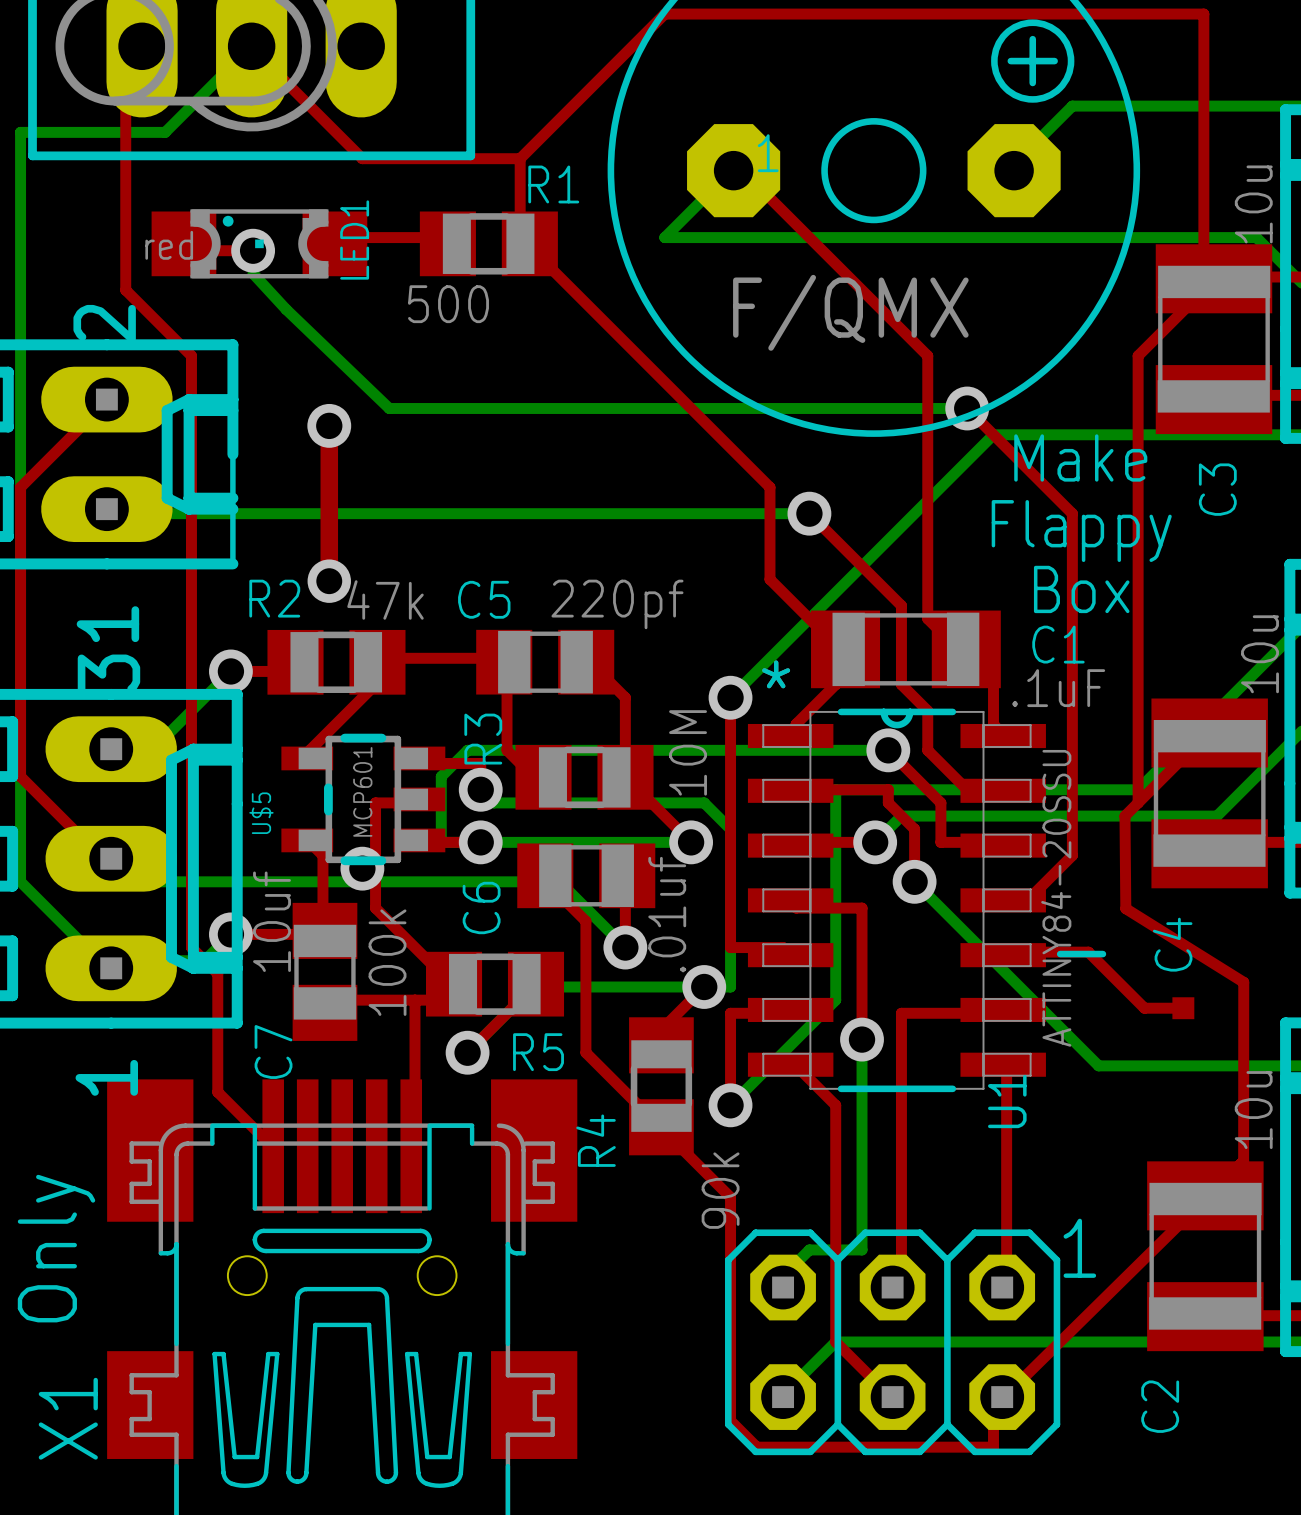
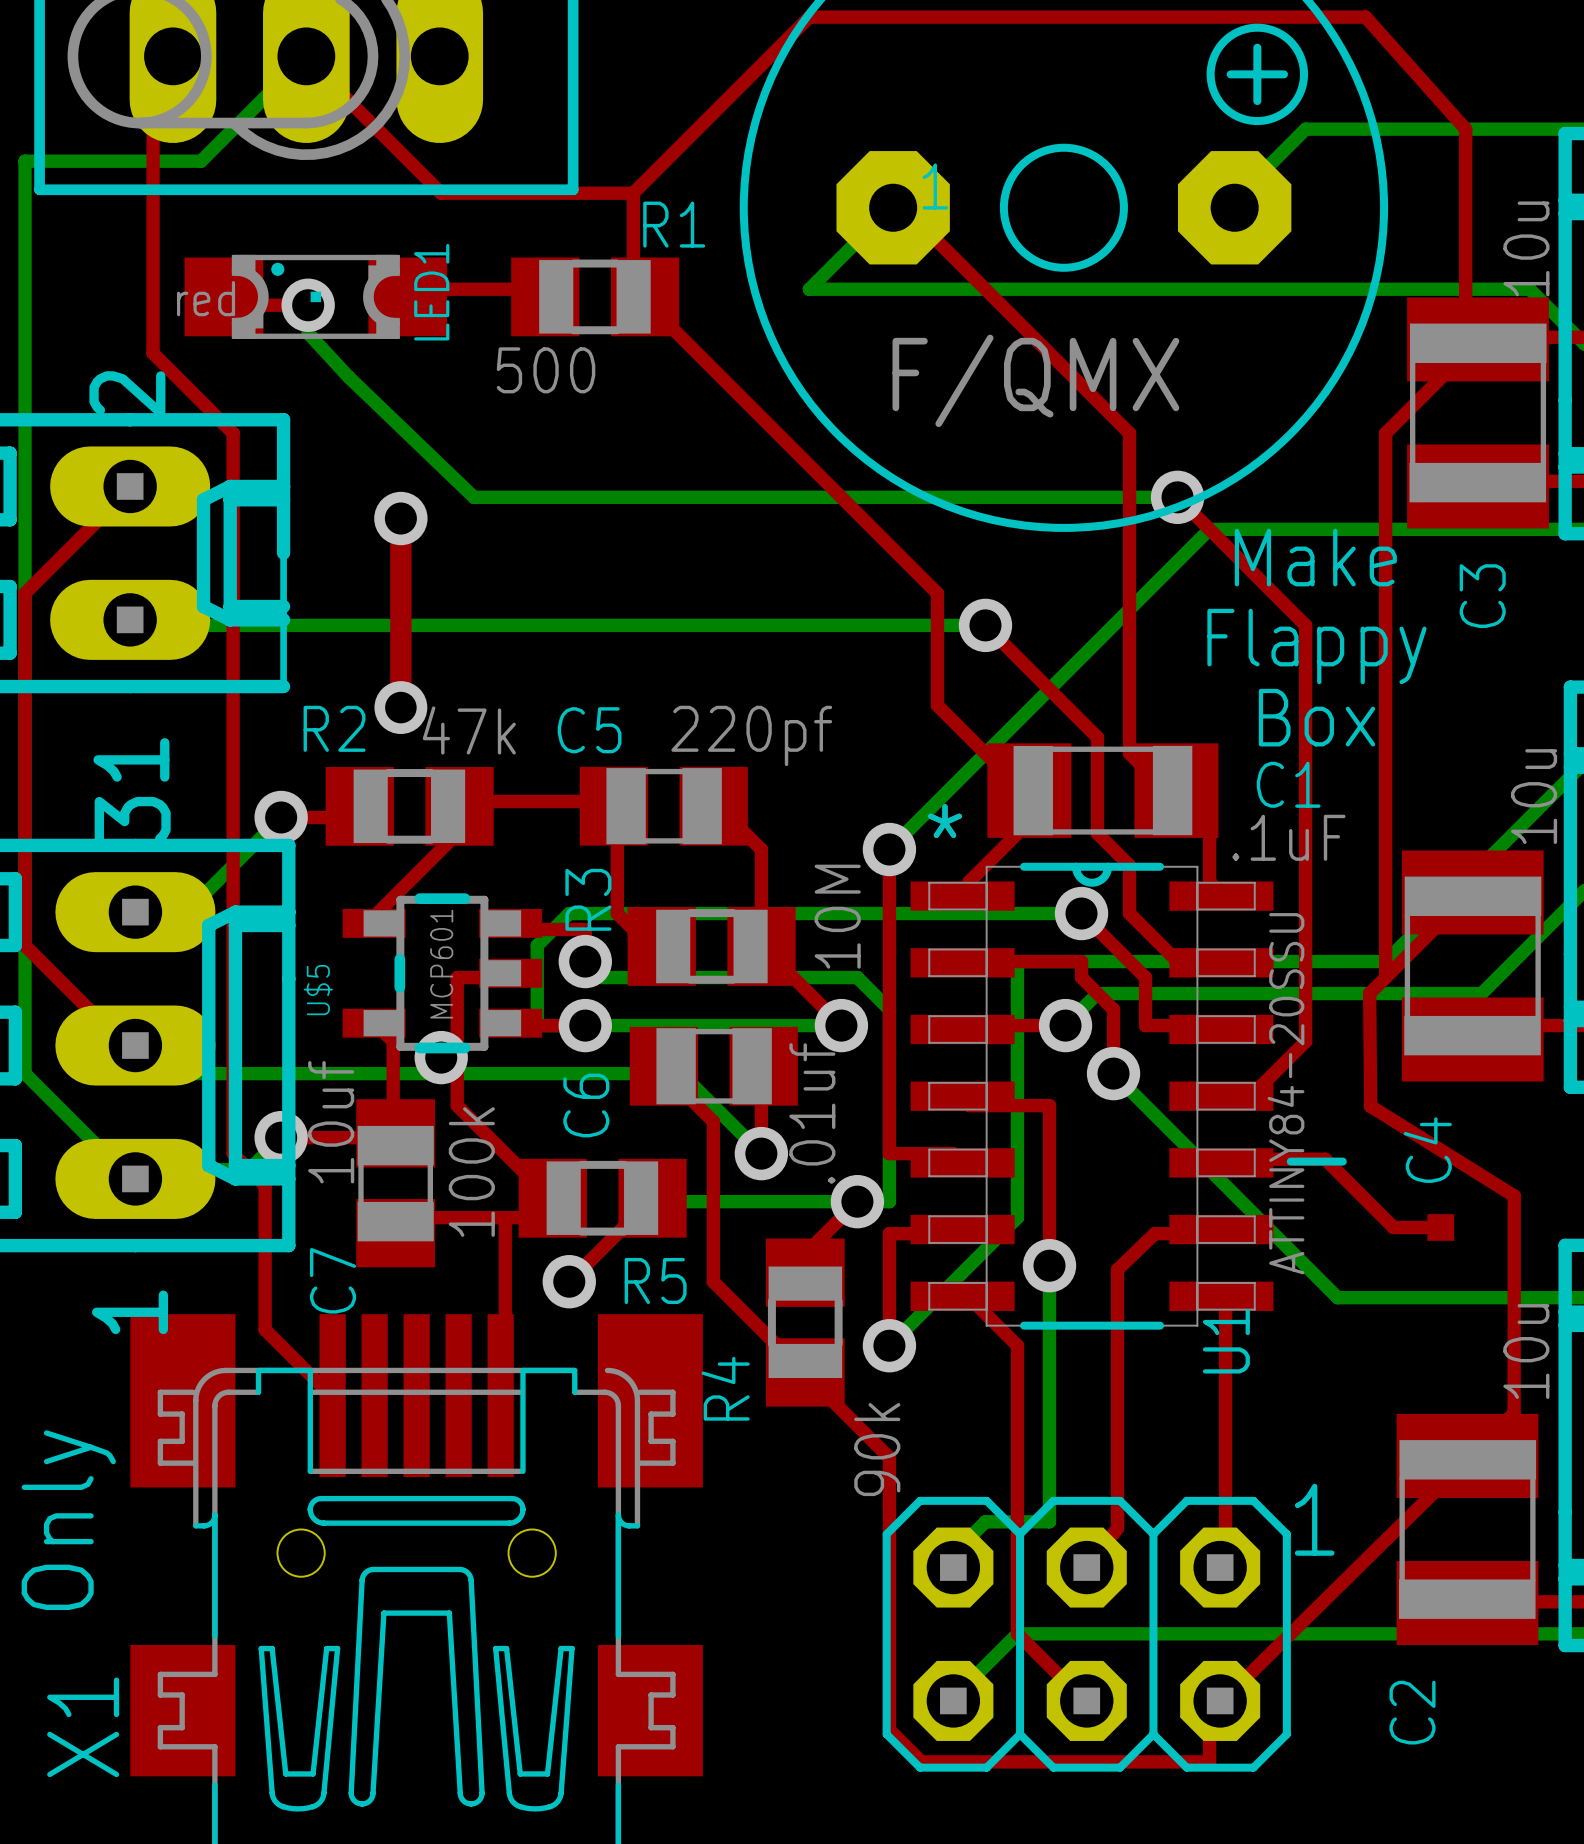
top track: (1121, 14) (1203, 14) (1203, 106) -> (1365, 17) (1465, 129)
top track: (948, 1013) (901, 1013) (901, 1276) -> (1154, 1233) (1117, 1269) (1117, 1528) (1097, 1553)

